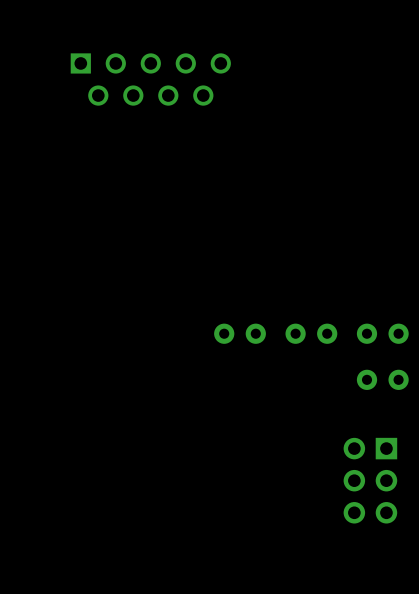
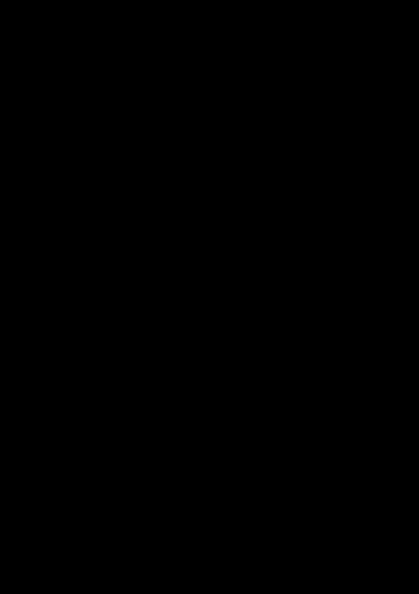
part: (150, 79) -> none
part: (240, 333) -> none
part: (311, 333) -> none
part: (382, 333) -> none
part: (382, 379) -> none
part: (370, 480) -> none

